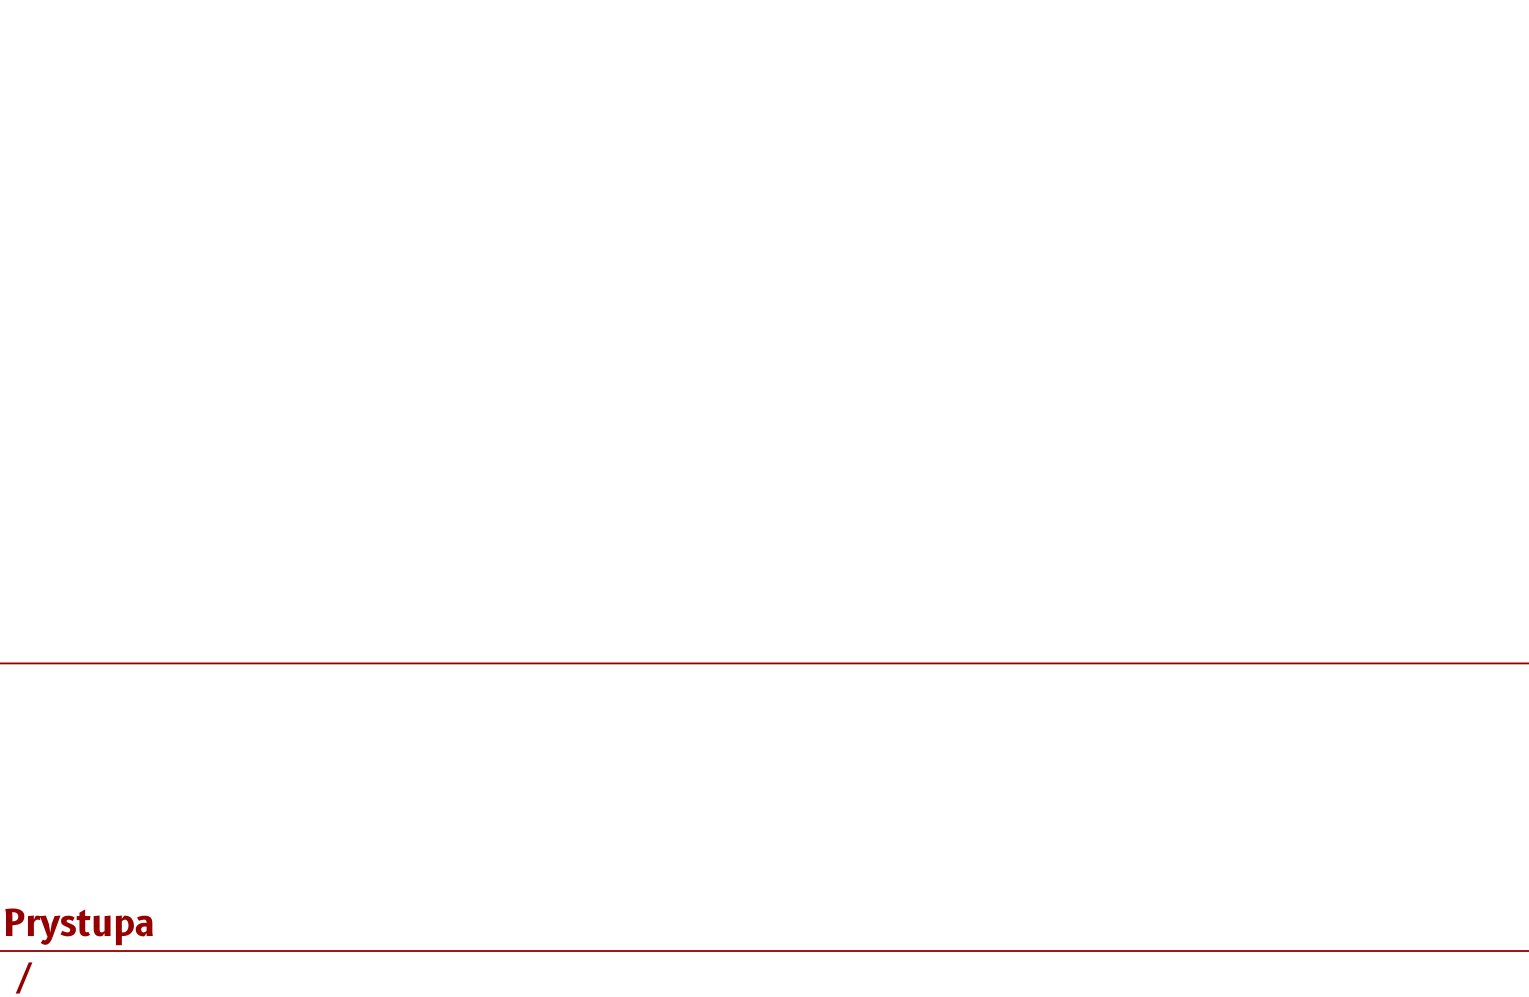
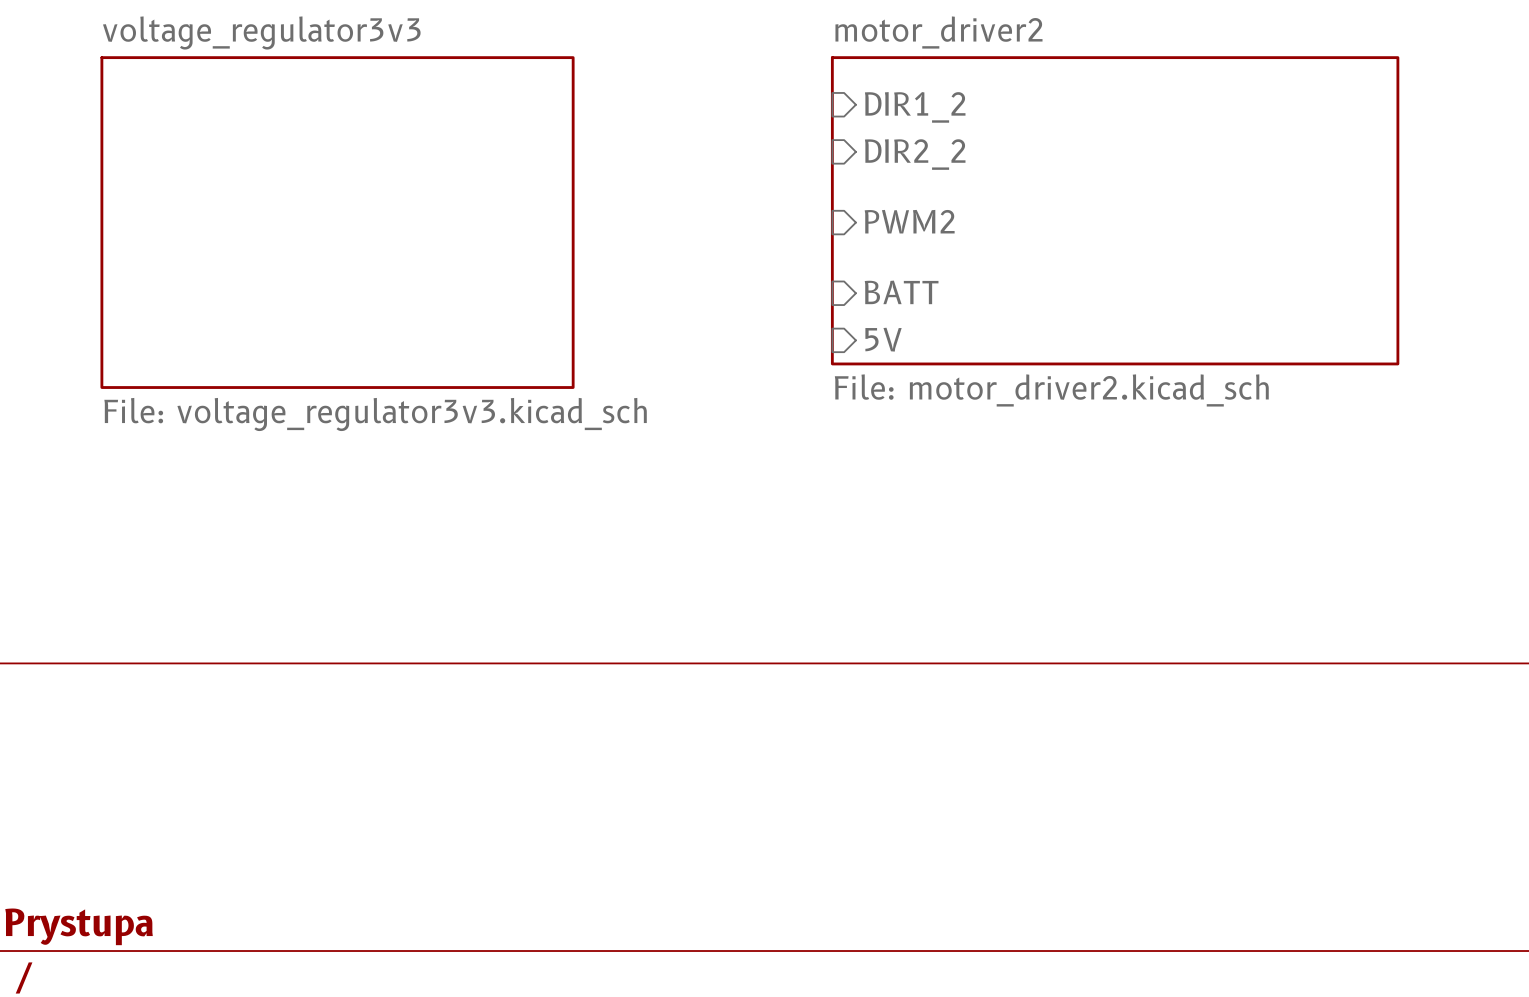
sheet pin: none -> DIR1_2 (915, 107)
sheet pin: none -> DIR2_2 (915, 154)
sheet motor_driver2: none -> File: motor_driver2.kicad_sch (1115, 210)
sheet pin: none -> PWM2 (909, 221)
sheet voltage_regulator3v3: none -> File: voltage_regulator3v3.kicad_sch (337, 222)
sheet pin: none -> BATT (901, 292)
sheet pin: none -> 5V (883, 339)

